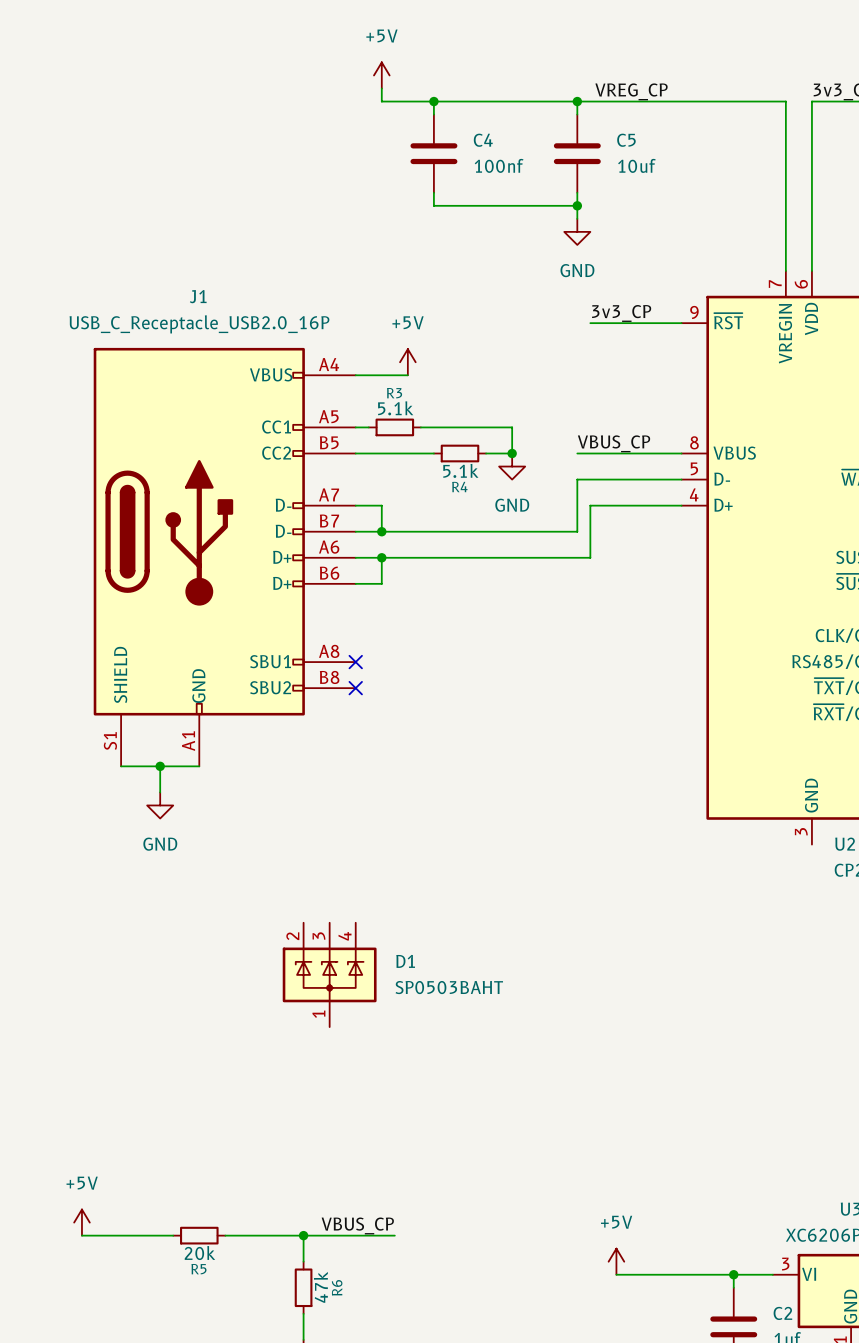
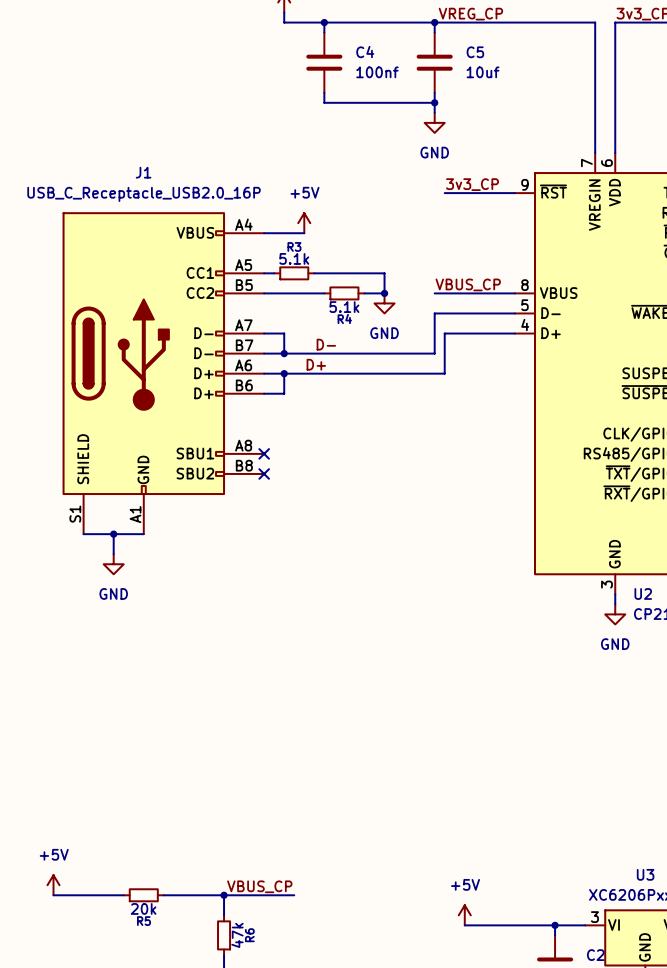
label: none -> D- (326, 344)
label: none -> D+ (316, 364)
wire: none -> (615, 594) (615, 604)
power symbol: none -> GND (615, 614)
D1: SP0503BAHT (329, 974) -> none

